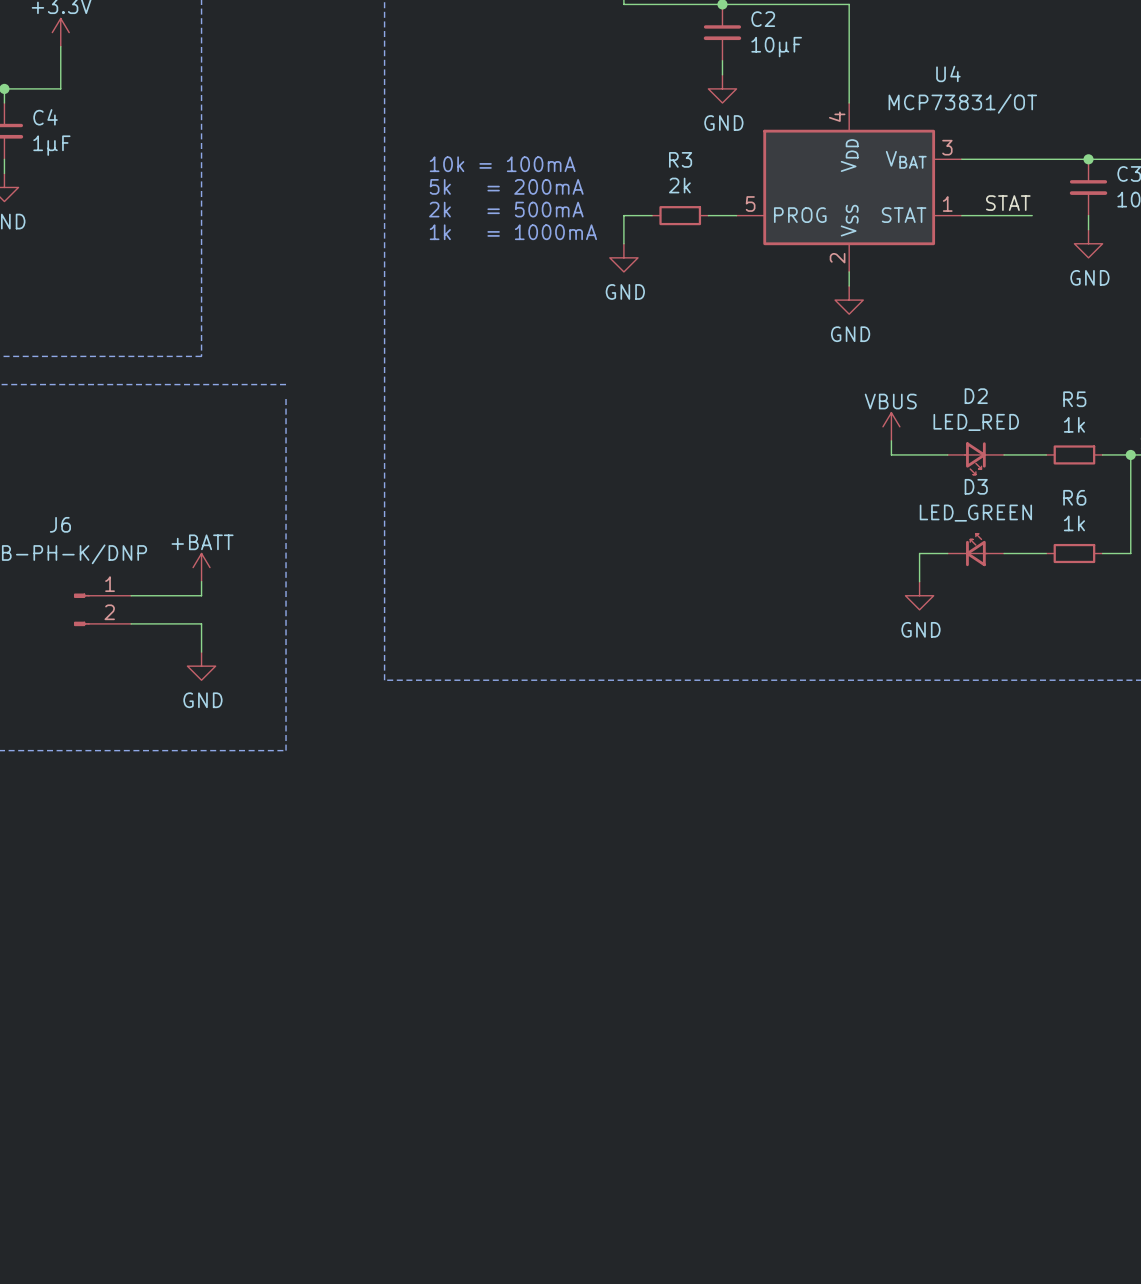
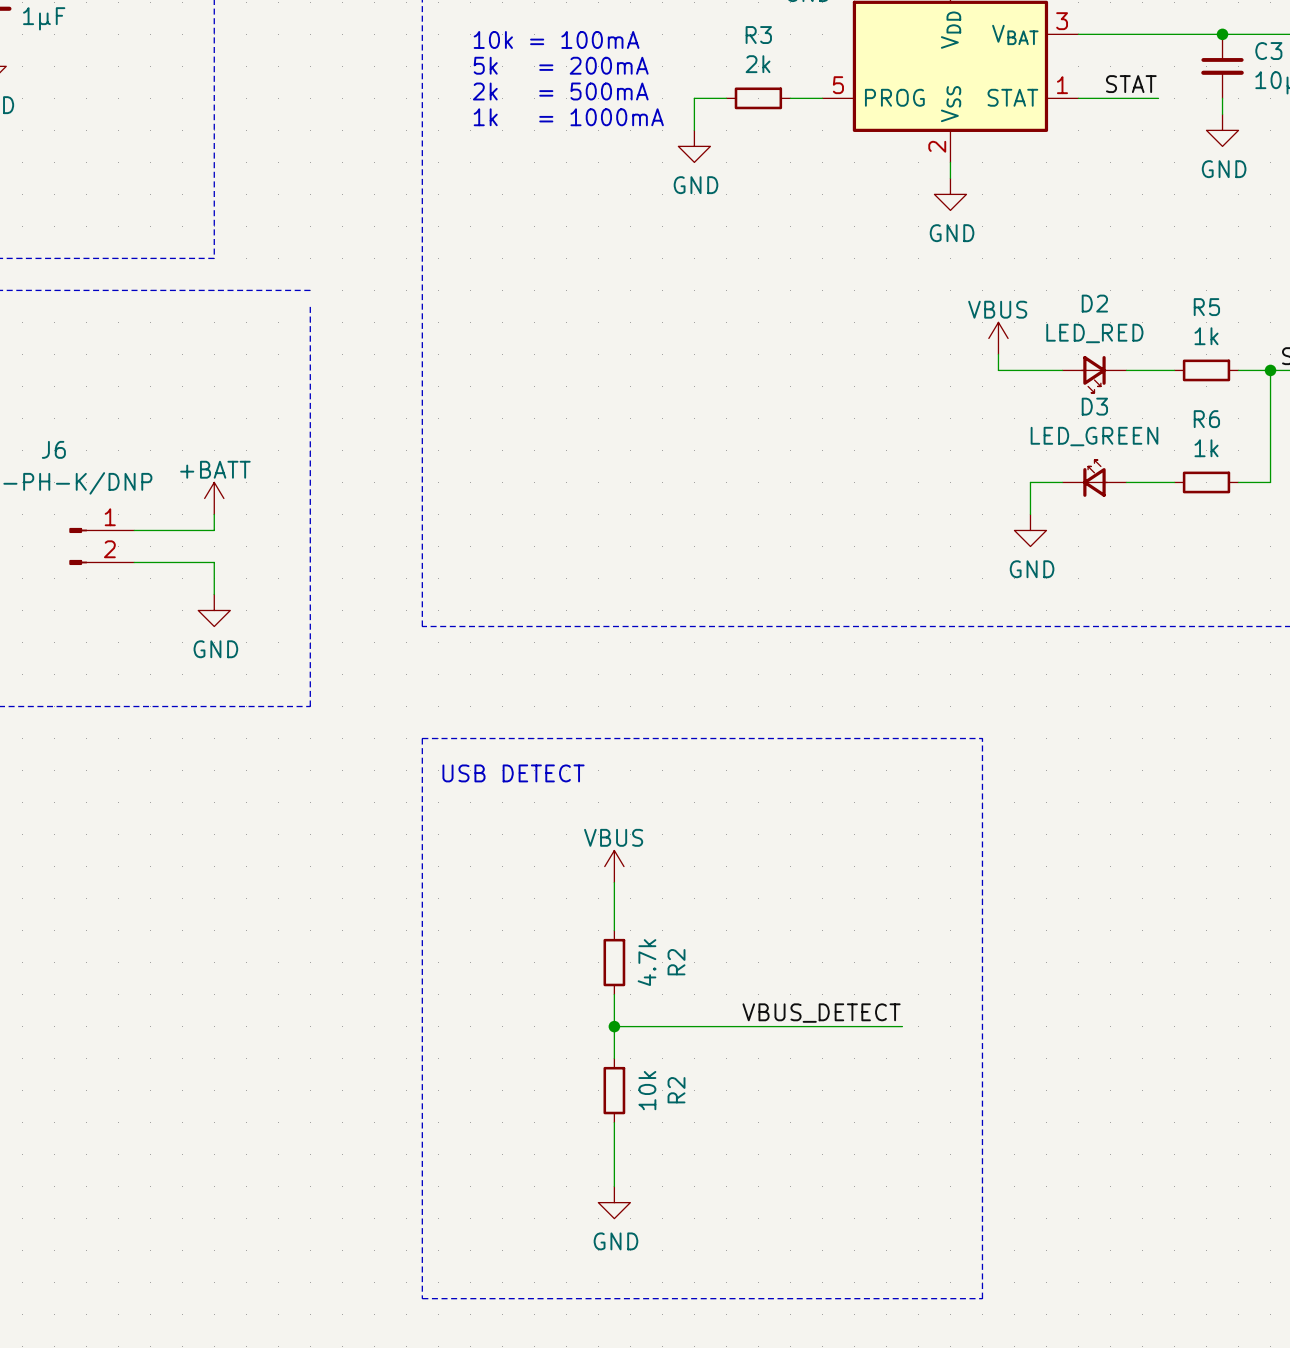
line: none -> (422, 738) (982, 738) (982, 1298) (422, 1298) (422, 738)
text: none -> USB DETECT (513, 773)
power symbol: none -> VBUS (614, 866)
wire: none -> (614, 882) (614, 930)
R2: none -> 4.7k (614, 962)
wire: none -> (614, 994) (614, 1058)
label: none -> VBUS_DETECT (821, 1013)
wire: none -> (614, 1026) (902, 1026)
junction: none -> (614, 1026)
R2: none -> 10k (614, 1090)
wire: none -> (614, 1122) (614, 1186)
power symbol: none -> GND (614, 1202)

